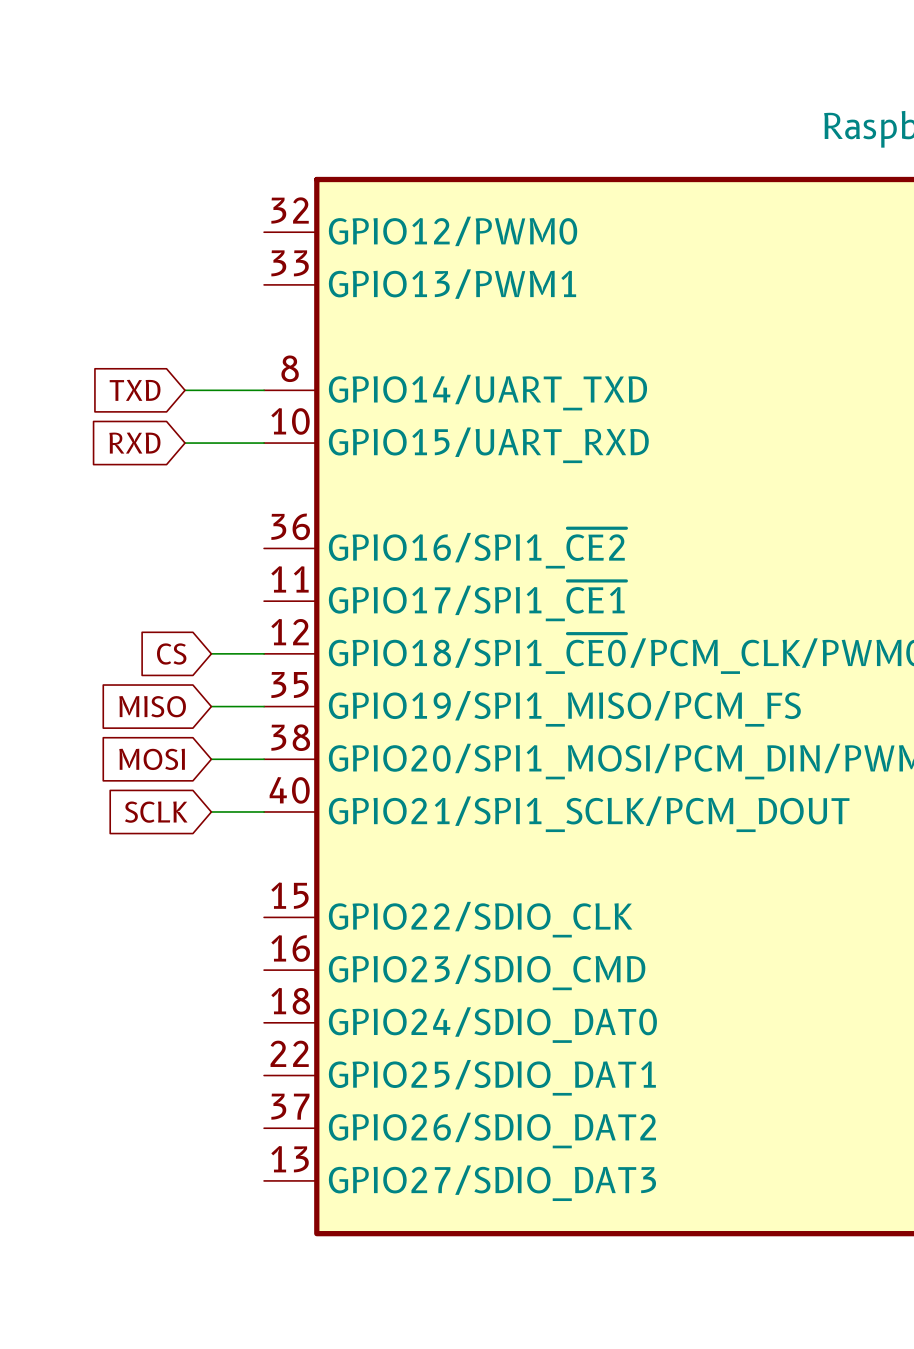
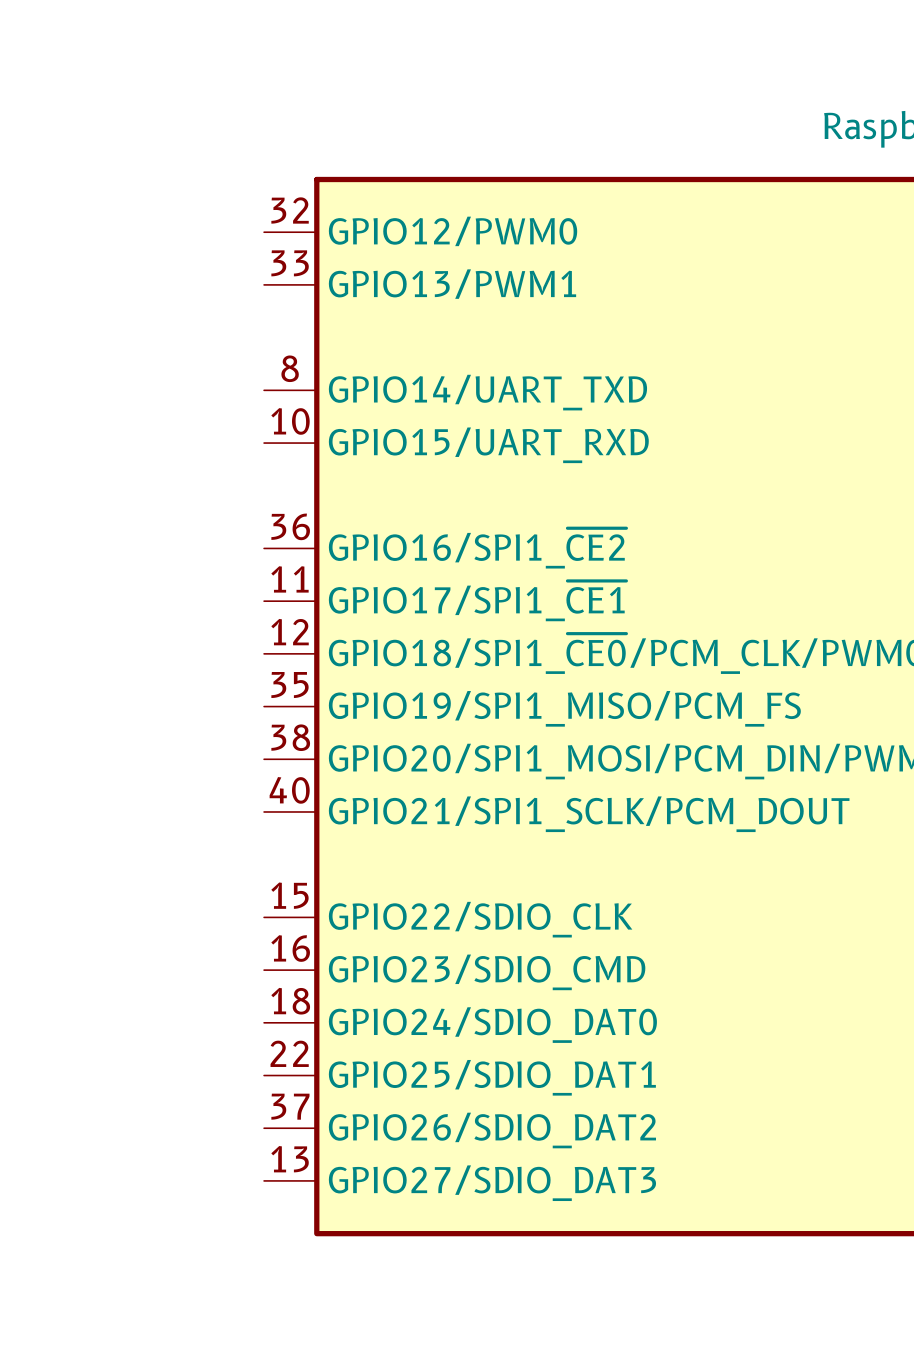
global label: TXD (135, 390) -> none
wire: (185, 390) (264, 390) -> none
global label: RXD (134, 443) -> none
wire: (185, 443) (264, 443) -> none
wire: (211, 653) (264, 653) -> none
global label: CS (171, 654) -> none
global label: MISO (152, 706) -> none
wire: (211, 706) (264, 706) -> none
global label: MOSI (152, 759) -> none
wire: (211, 759) (264, 759) -> none
wire: (211, 811) (264, 811) -> none
global label: SCLK (156, 812) -> none

